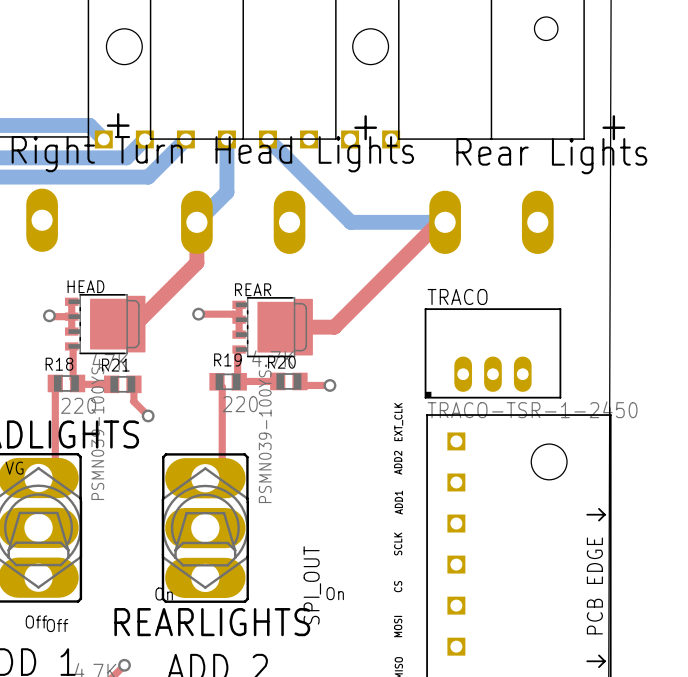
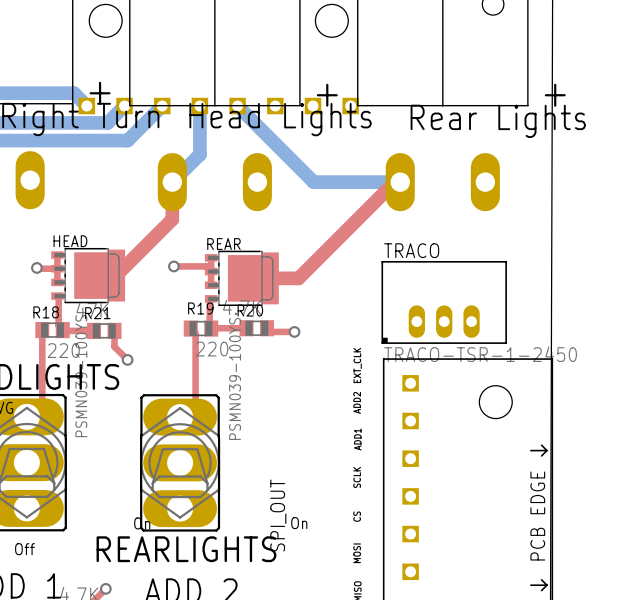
text: Off (57, 625) -> none

